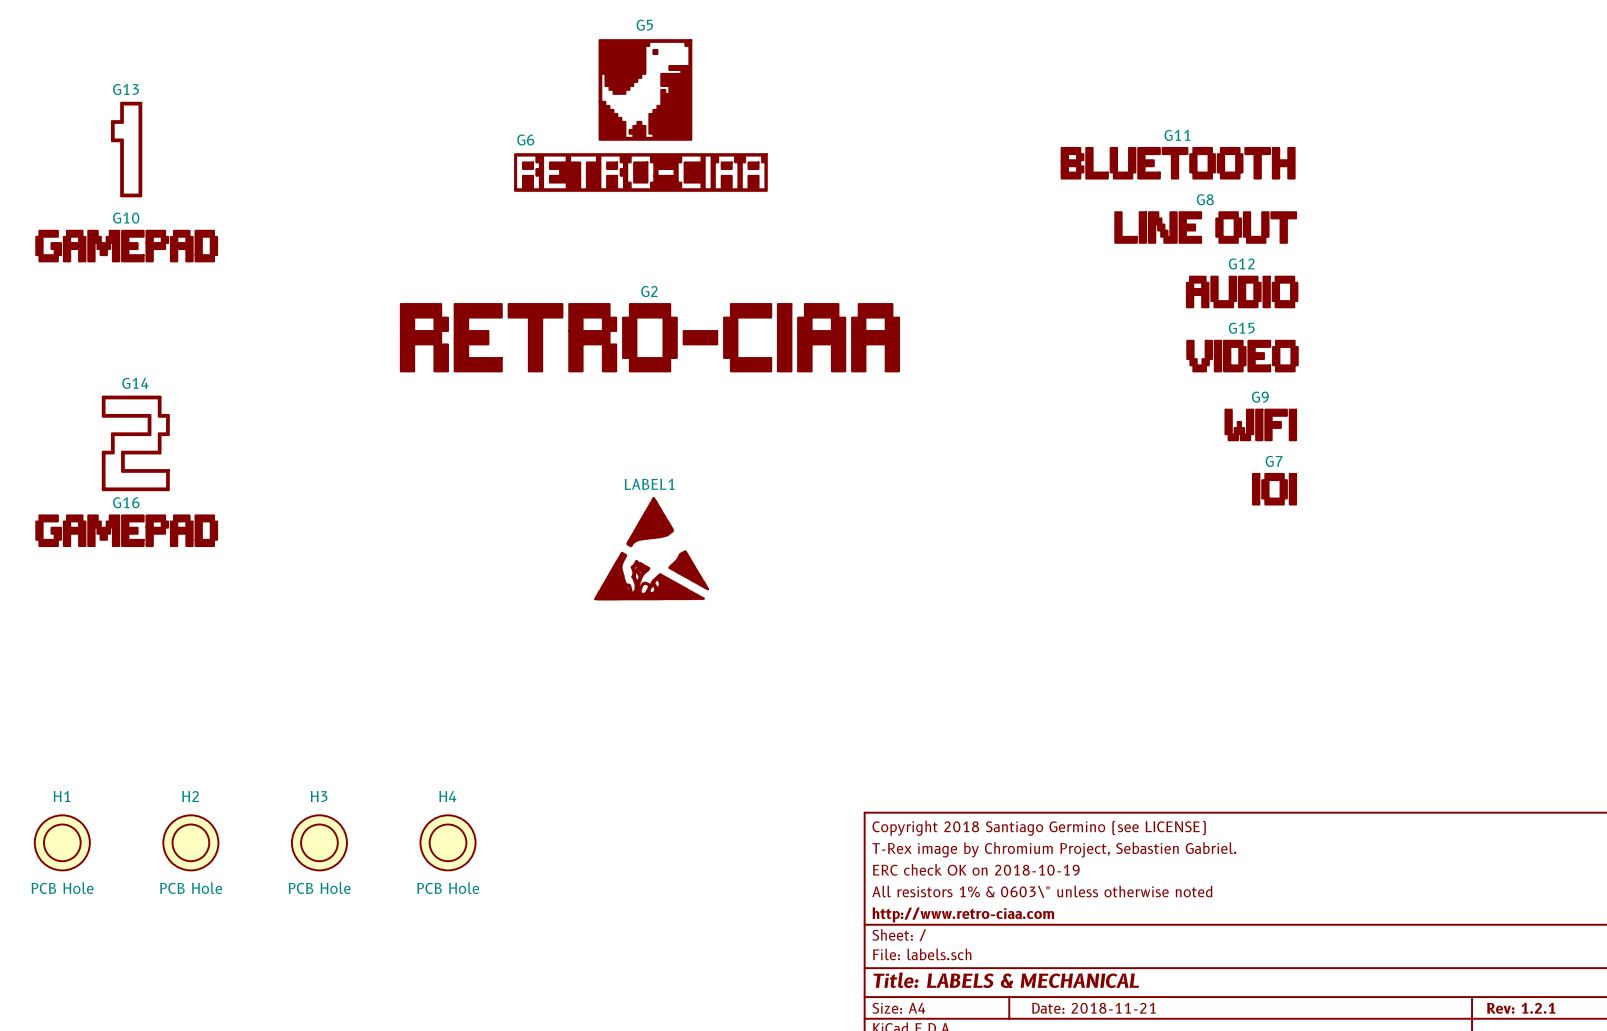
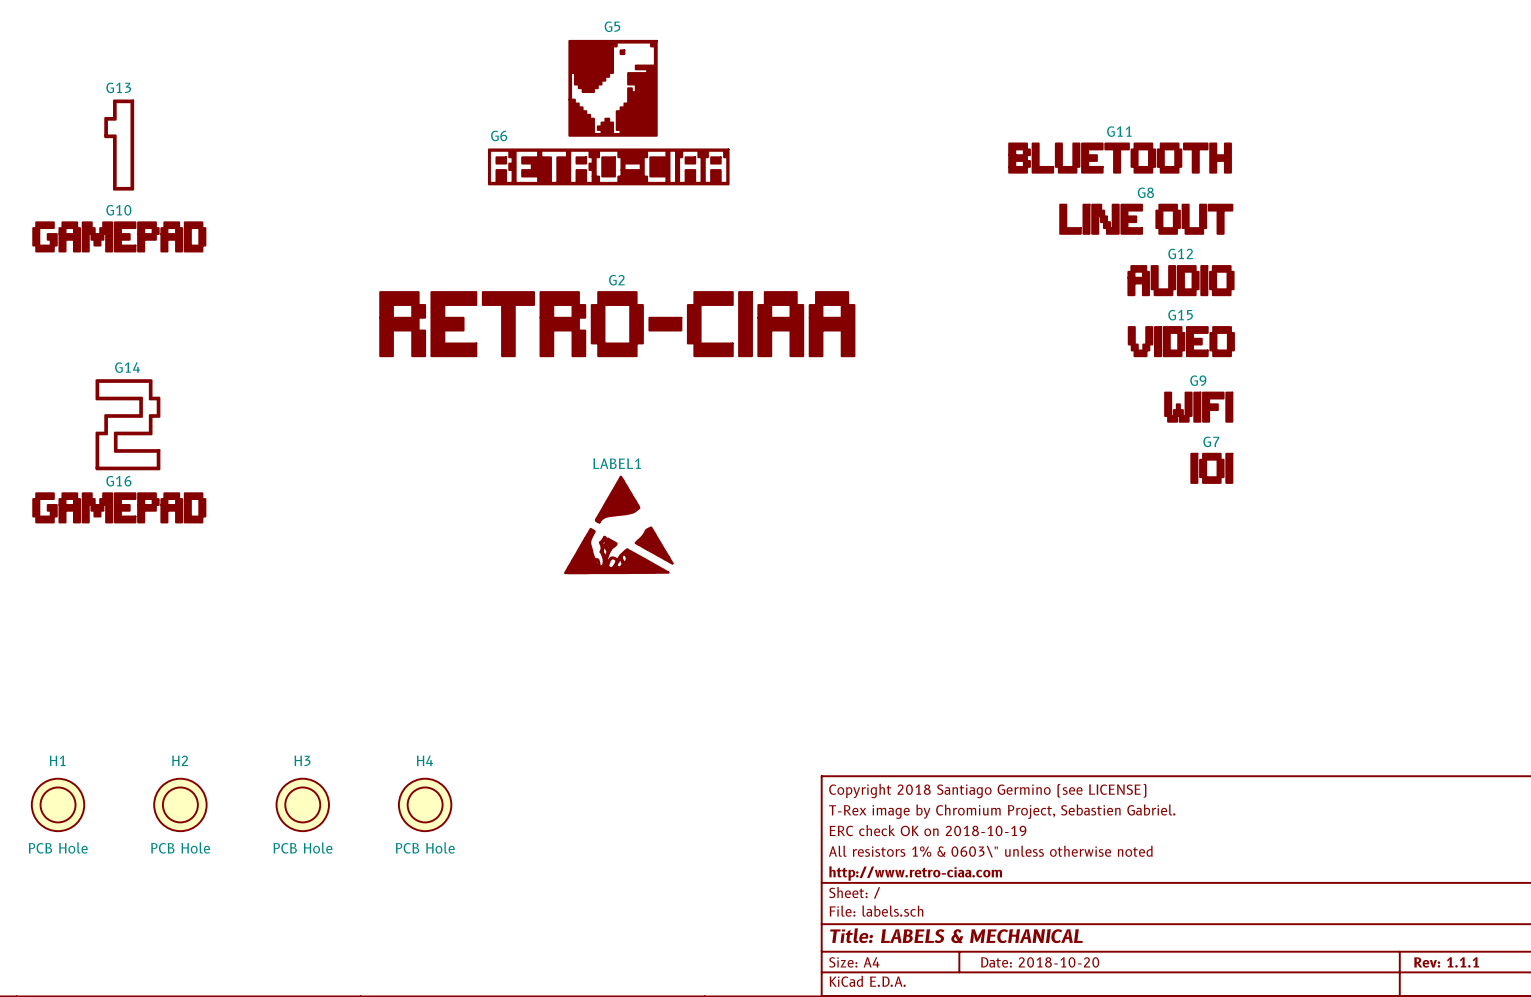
title block: Date: 2018-11-21 (1093, 1008) -> Date: 2018-10-20 (1040, 962)
title block: Rev: 1.2.1 (1521, 1008) -> Rev: 1.1.1 (1446, 962)

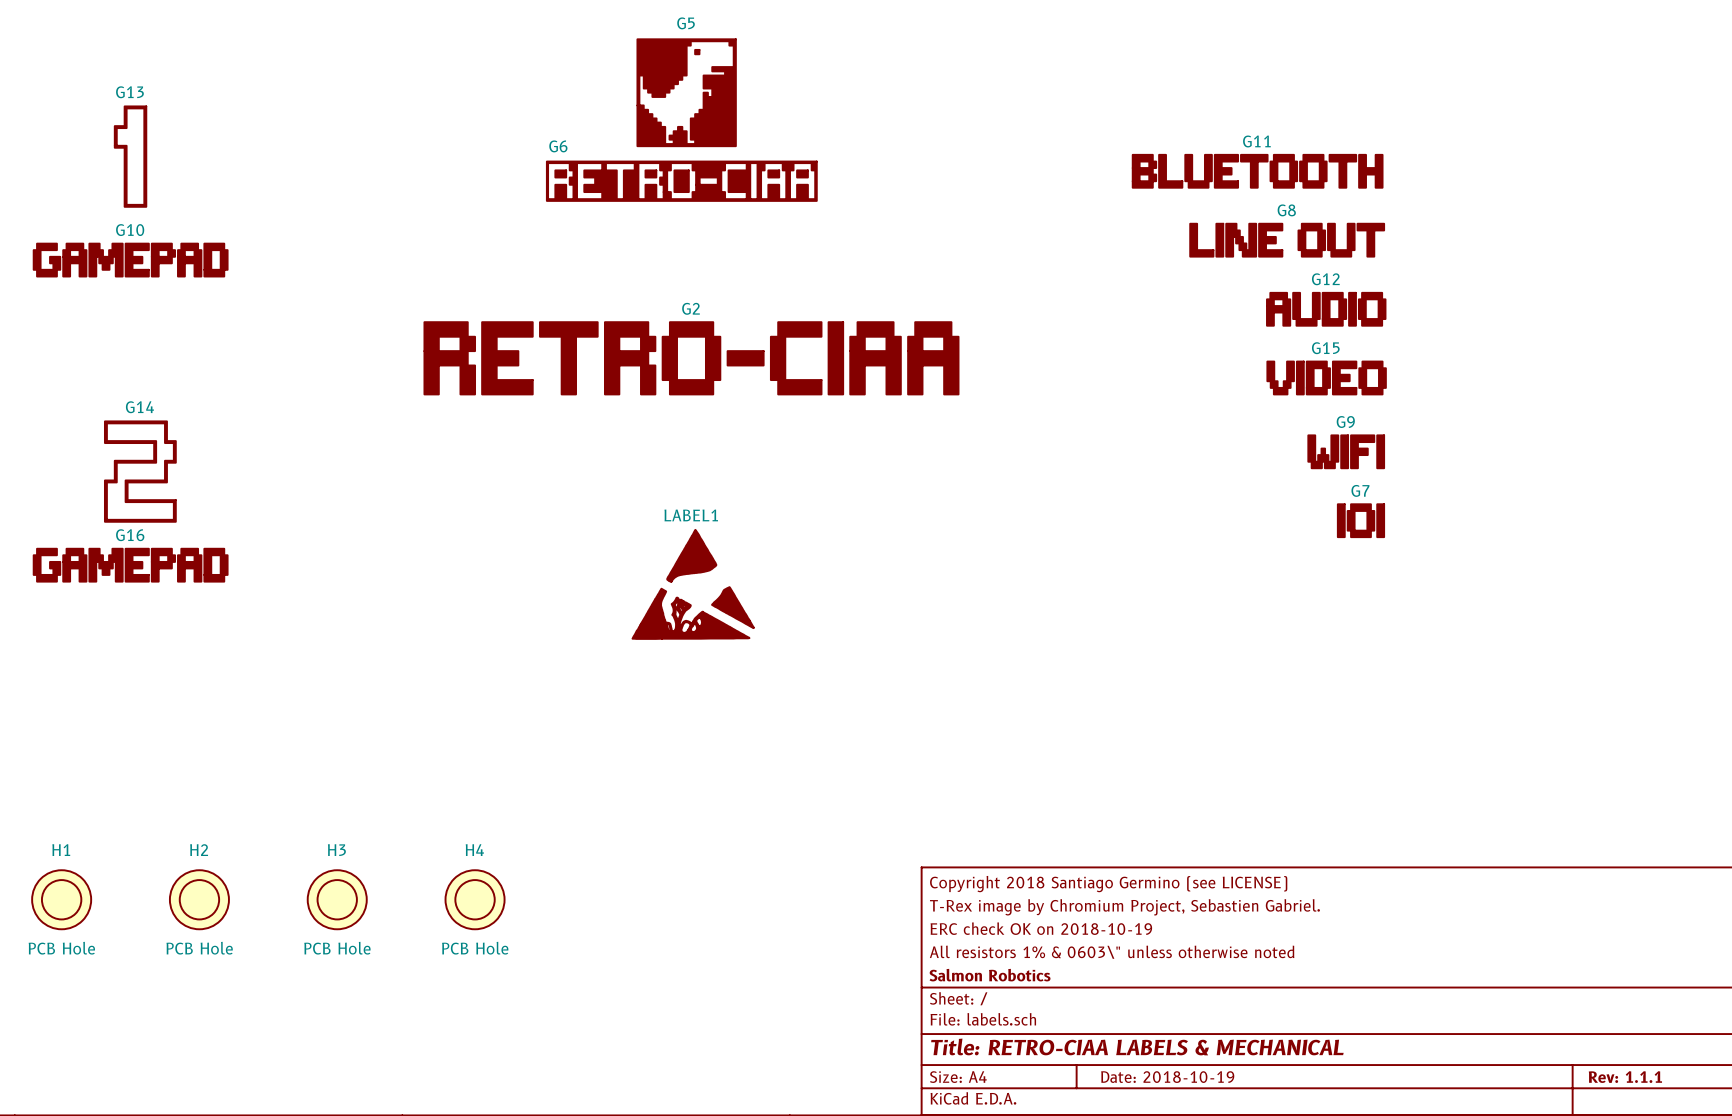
title block: http://www.retro-ciaa.com (915, 873) -> Salmon Robotics (990, 975)
title block: Title: LABELS & MECHANICAL (956, 935) -> Title: RETRO-CIAA LABELS & MECHANICAL (1137, 1046)
title block: Date: 2018-10-20 (1040, 962) -> Date: 2018-10-19 (1167, 1077)

